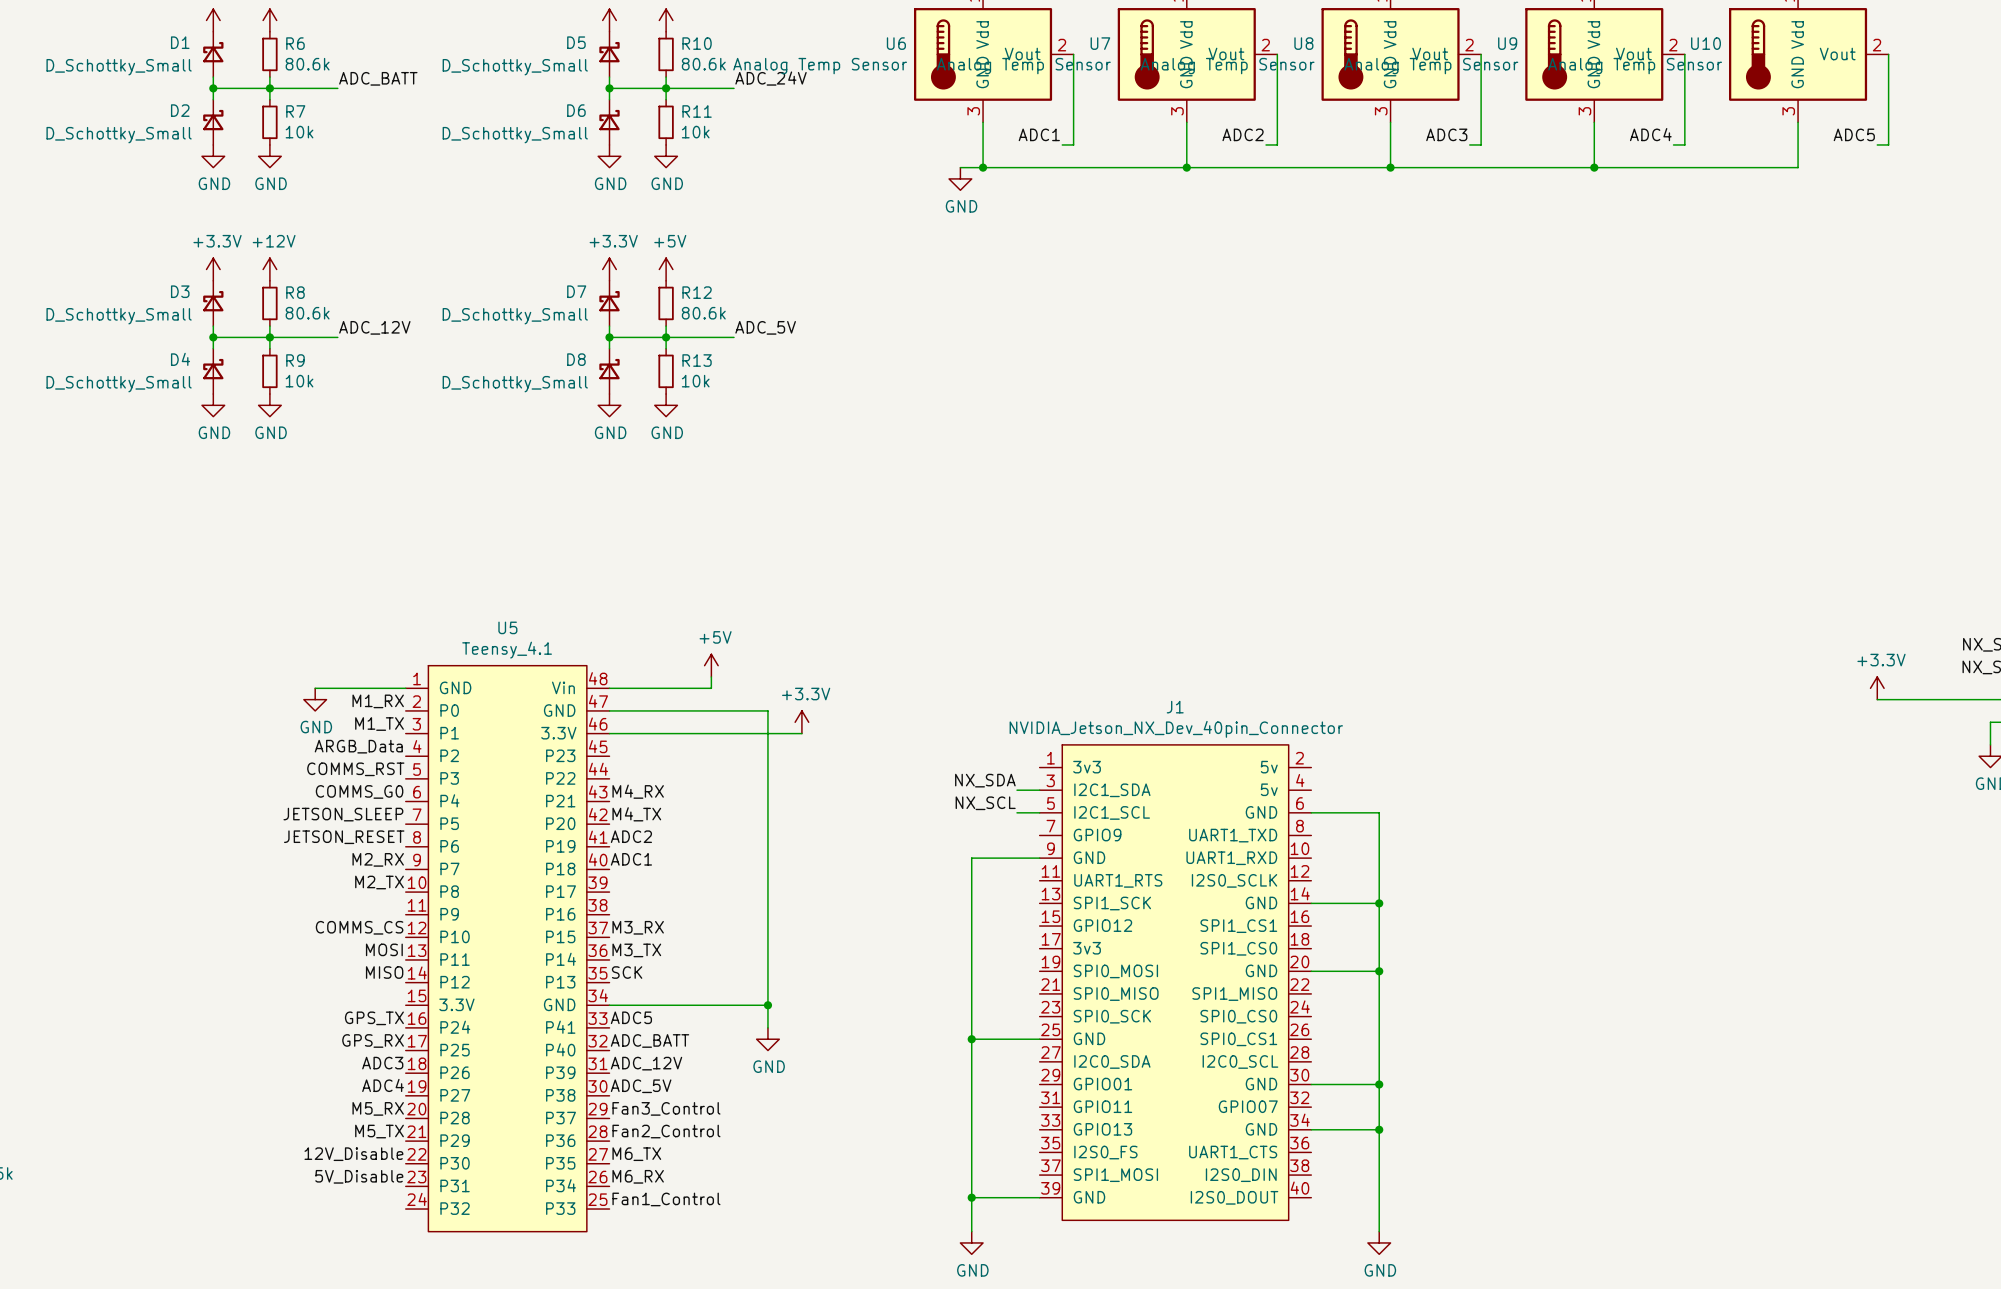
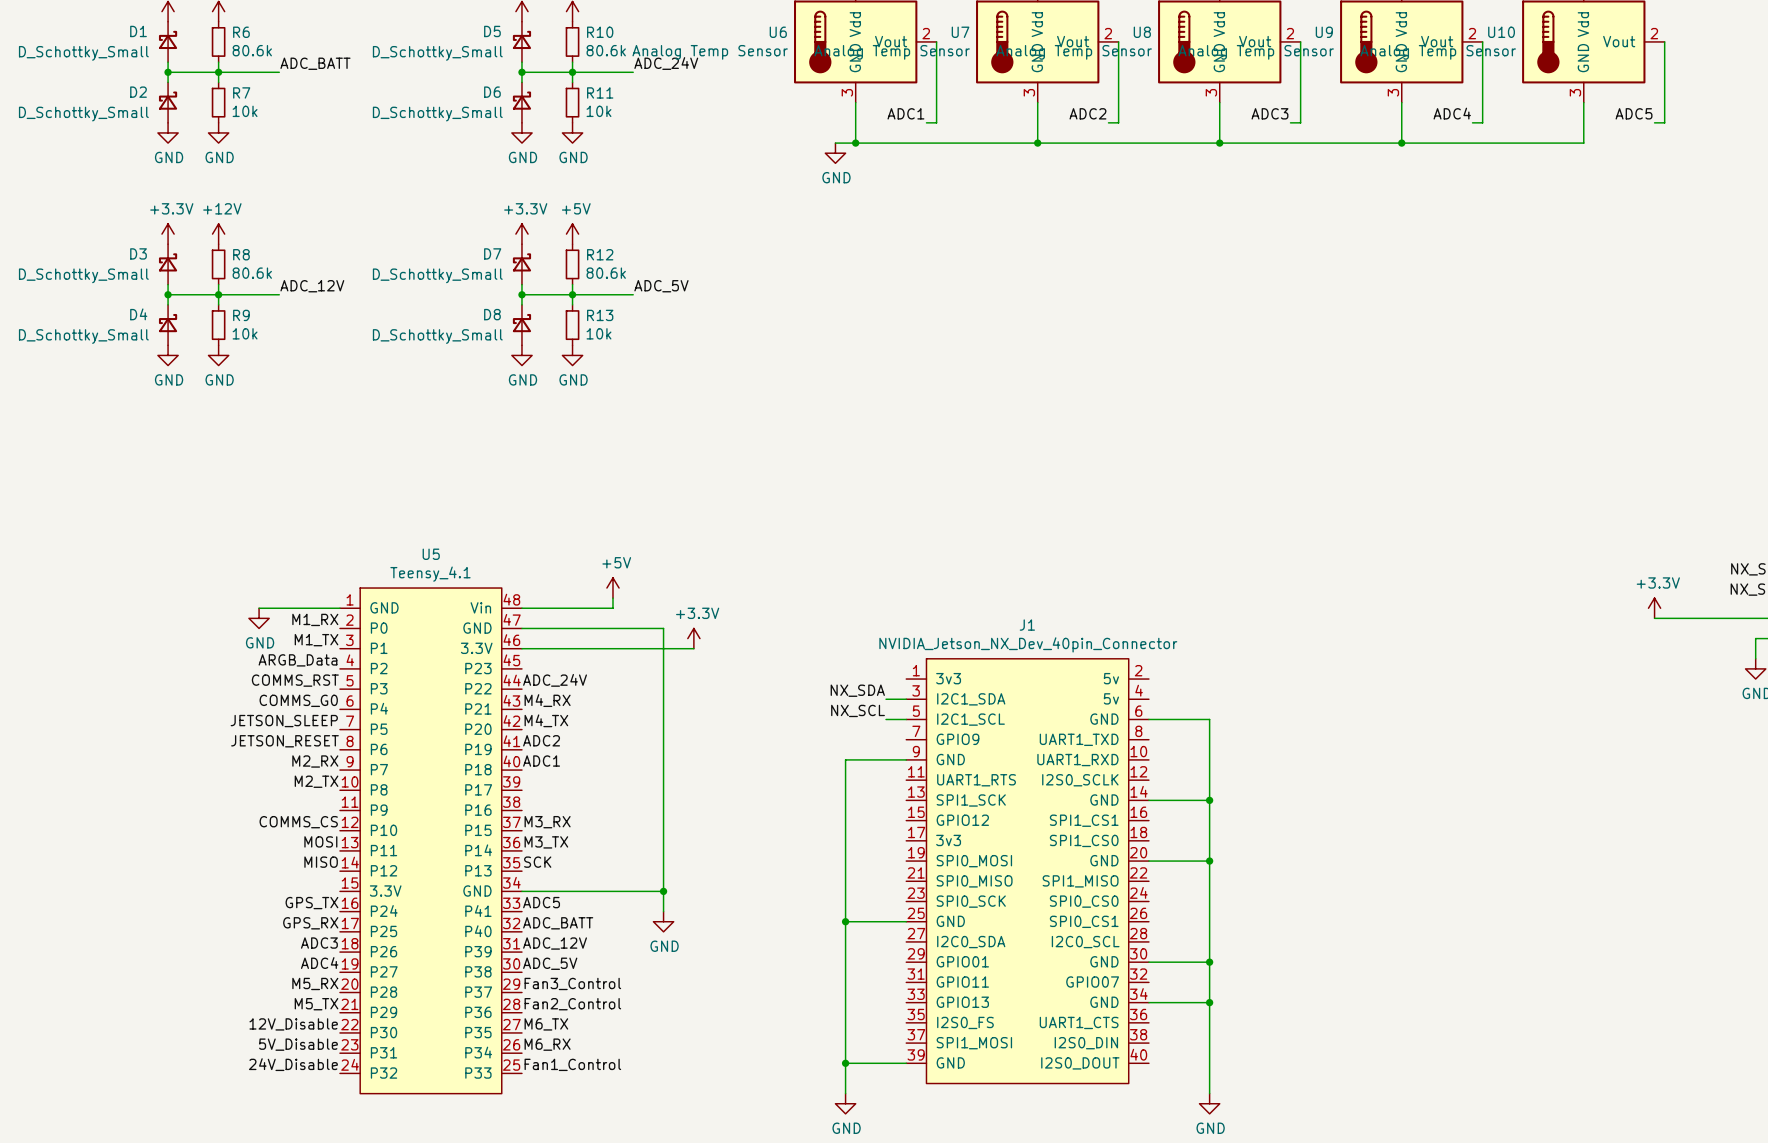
label: none -> ADC_24V (555, 680)
label: none -> 24V_Disable (293, 1064)

